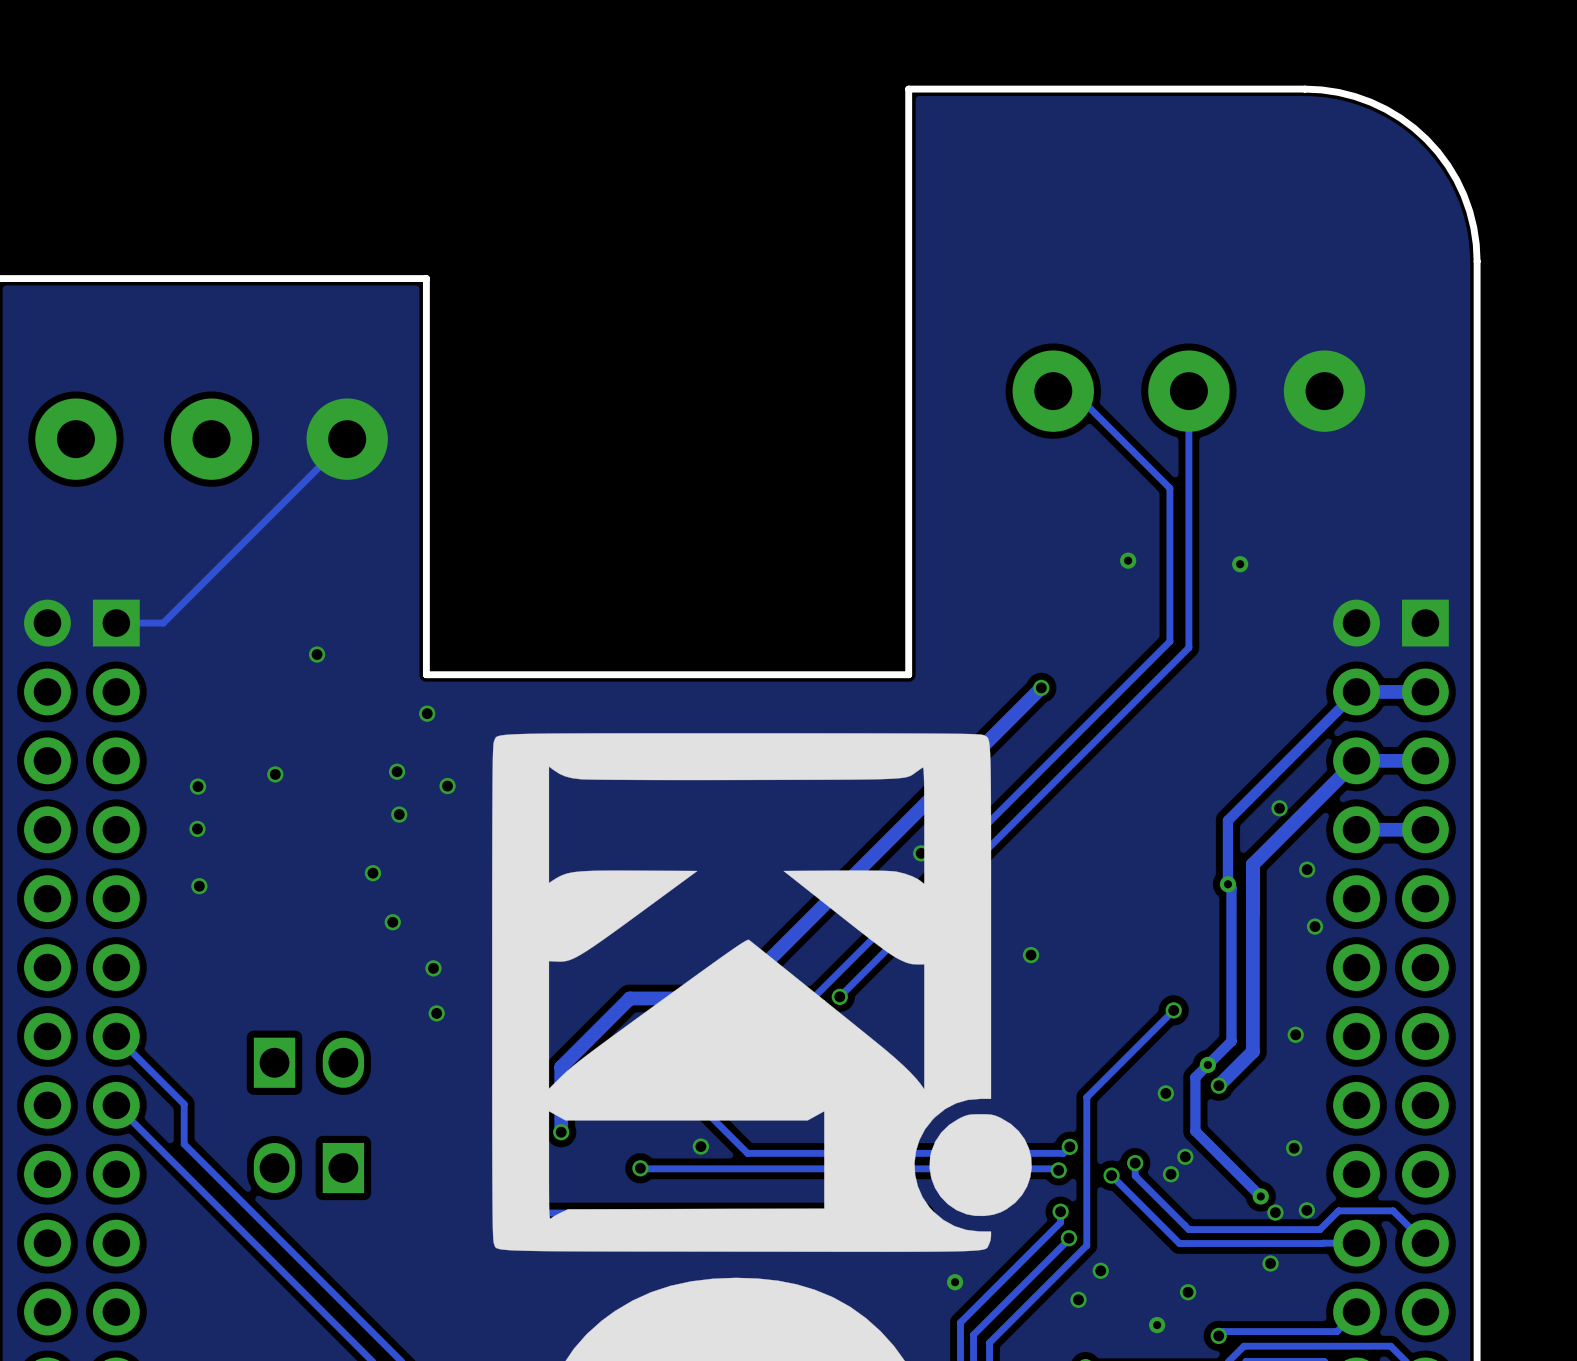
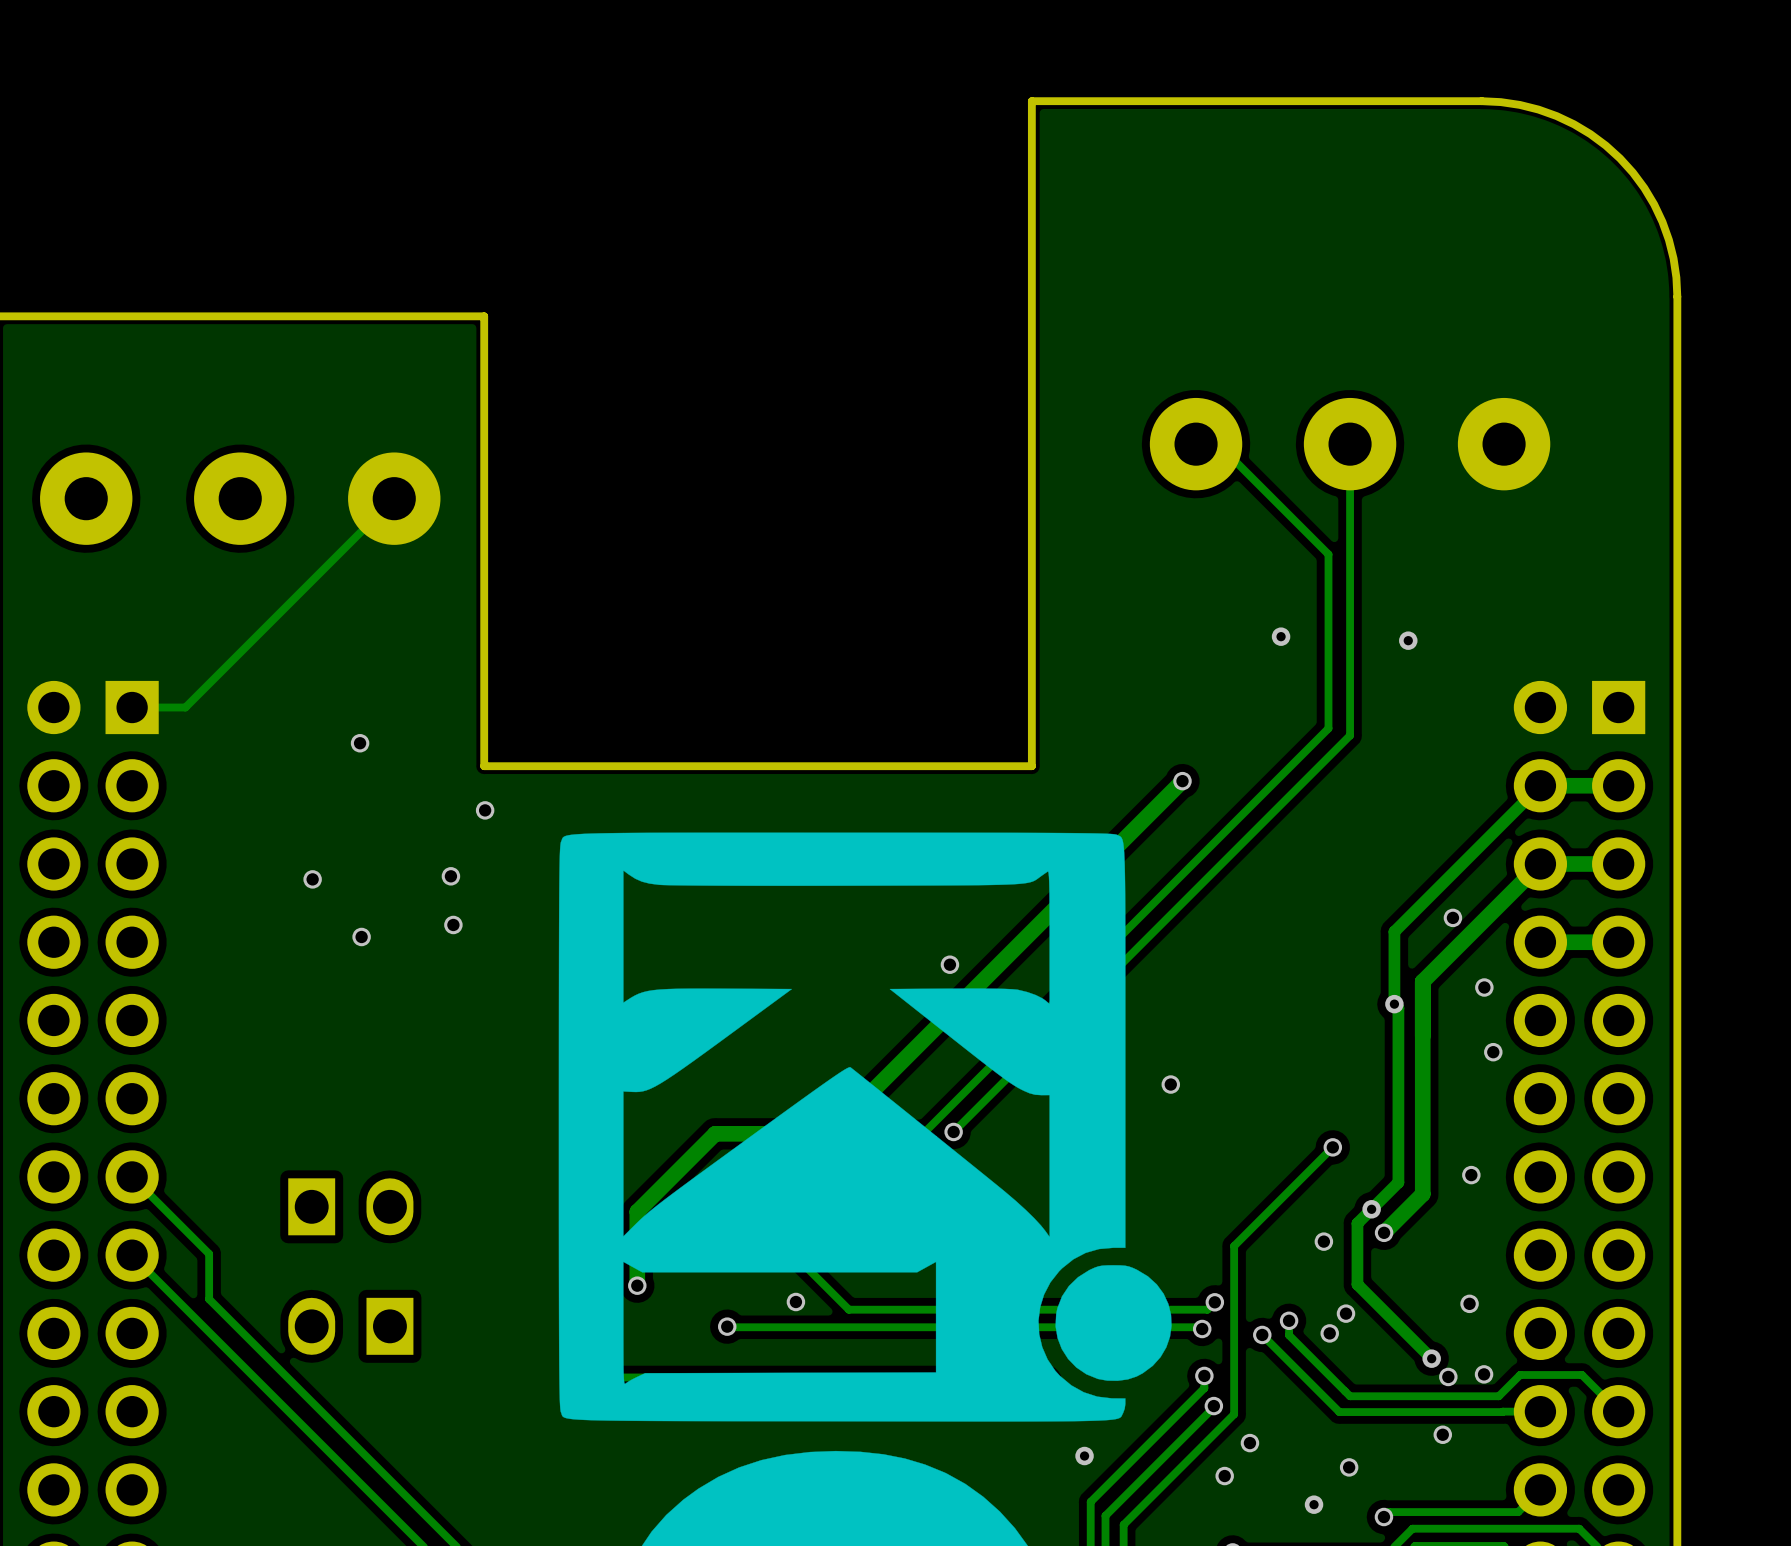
via: (198, 786) -> none
via: (447, 786) -> none
via: none -> (361, 936)
via: (197, 828) -> none
via position: (921, 853) -> (949, 964)
via: (372, 873) -> none
via: (199, 886) -> none
via: (392, 922) -> none
via: (433, 968) -> none
via: (436, 1013) -> none

